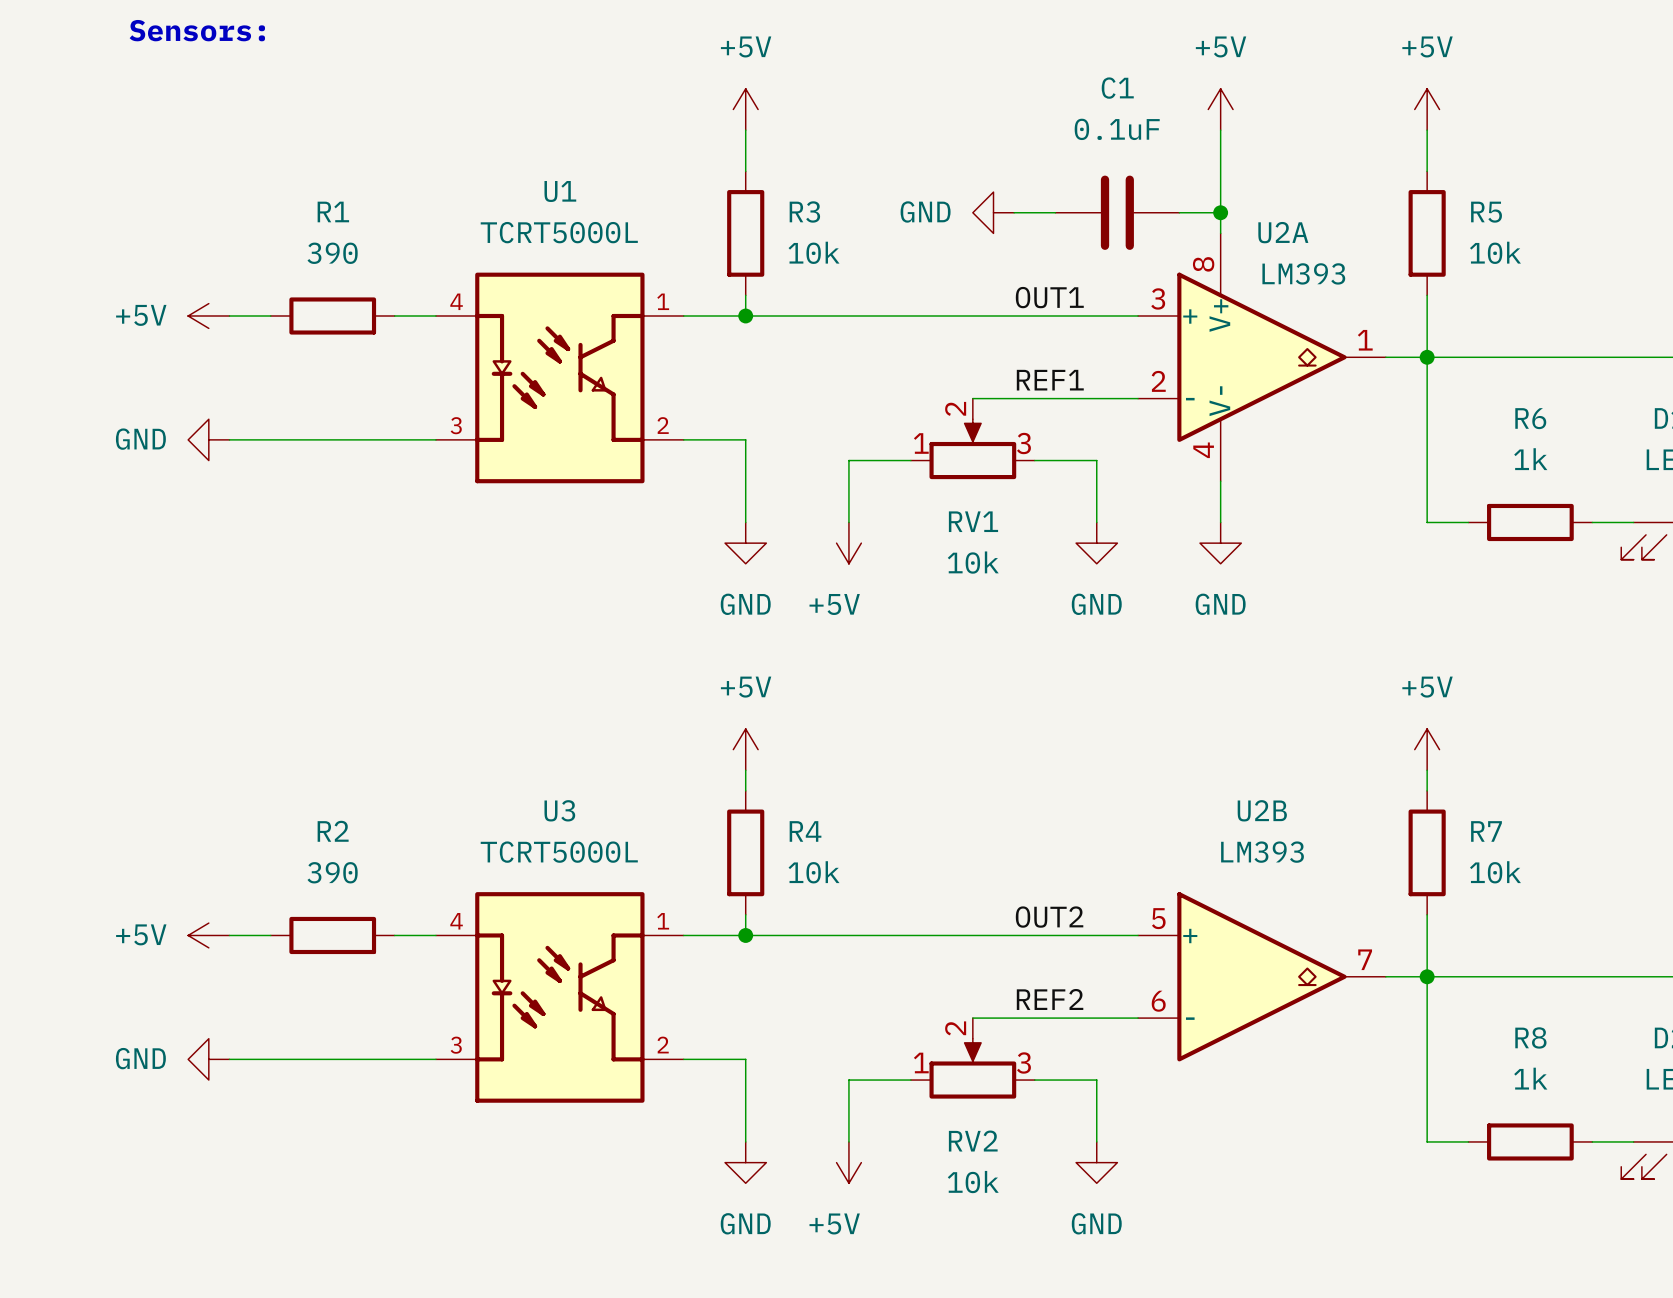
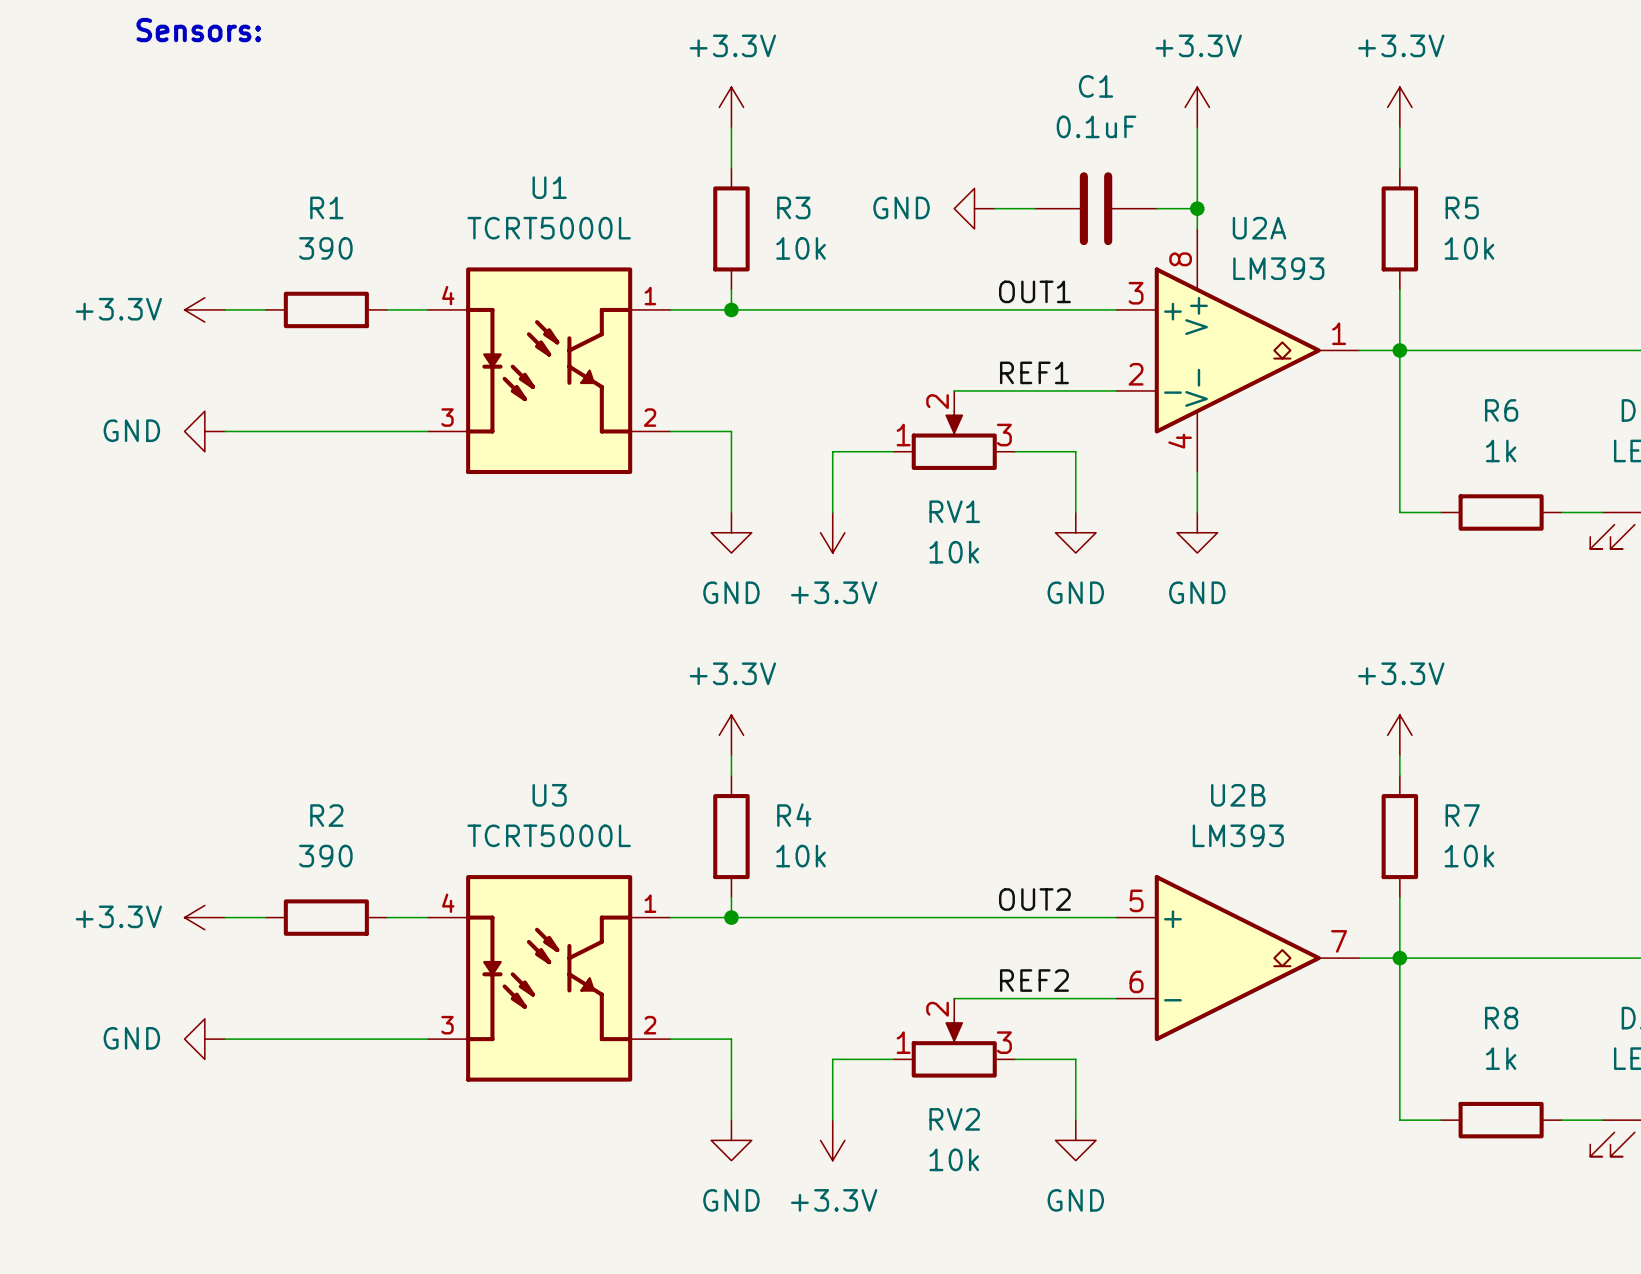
power symbol: +5V (745, 109) -> +3.3V (731, 107)
power symbol: +5V (1220, 109) -> +3.3V (1197, 107)
power symbol: +5V (1427, 109) -> +3.3V (1399, 107)
U1 symbol: [435, 272, 684, 484] -> [427, 267, 671, 475]
power symbol: +5V (208, 315) -> +3.3V (204, 309)
power symbol: +5V (848, 543) -> +3.3V (832, 532)
power symbol: +5V (745, 749) -> +3.3V (731, 735)
power symbol: +5V (1427, 749) -> +3.3V (1399, 735)
U3 symbol: [435, 892, 684, 1103] -> [427, 875, 671, 1082]
power symbol: +5V (208, 935) -> +3.3V (204, 917)
power symbol: +5V (848, 1162) -> +3.3V (832, 1140)

